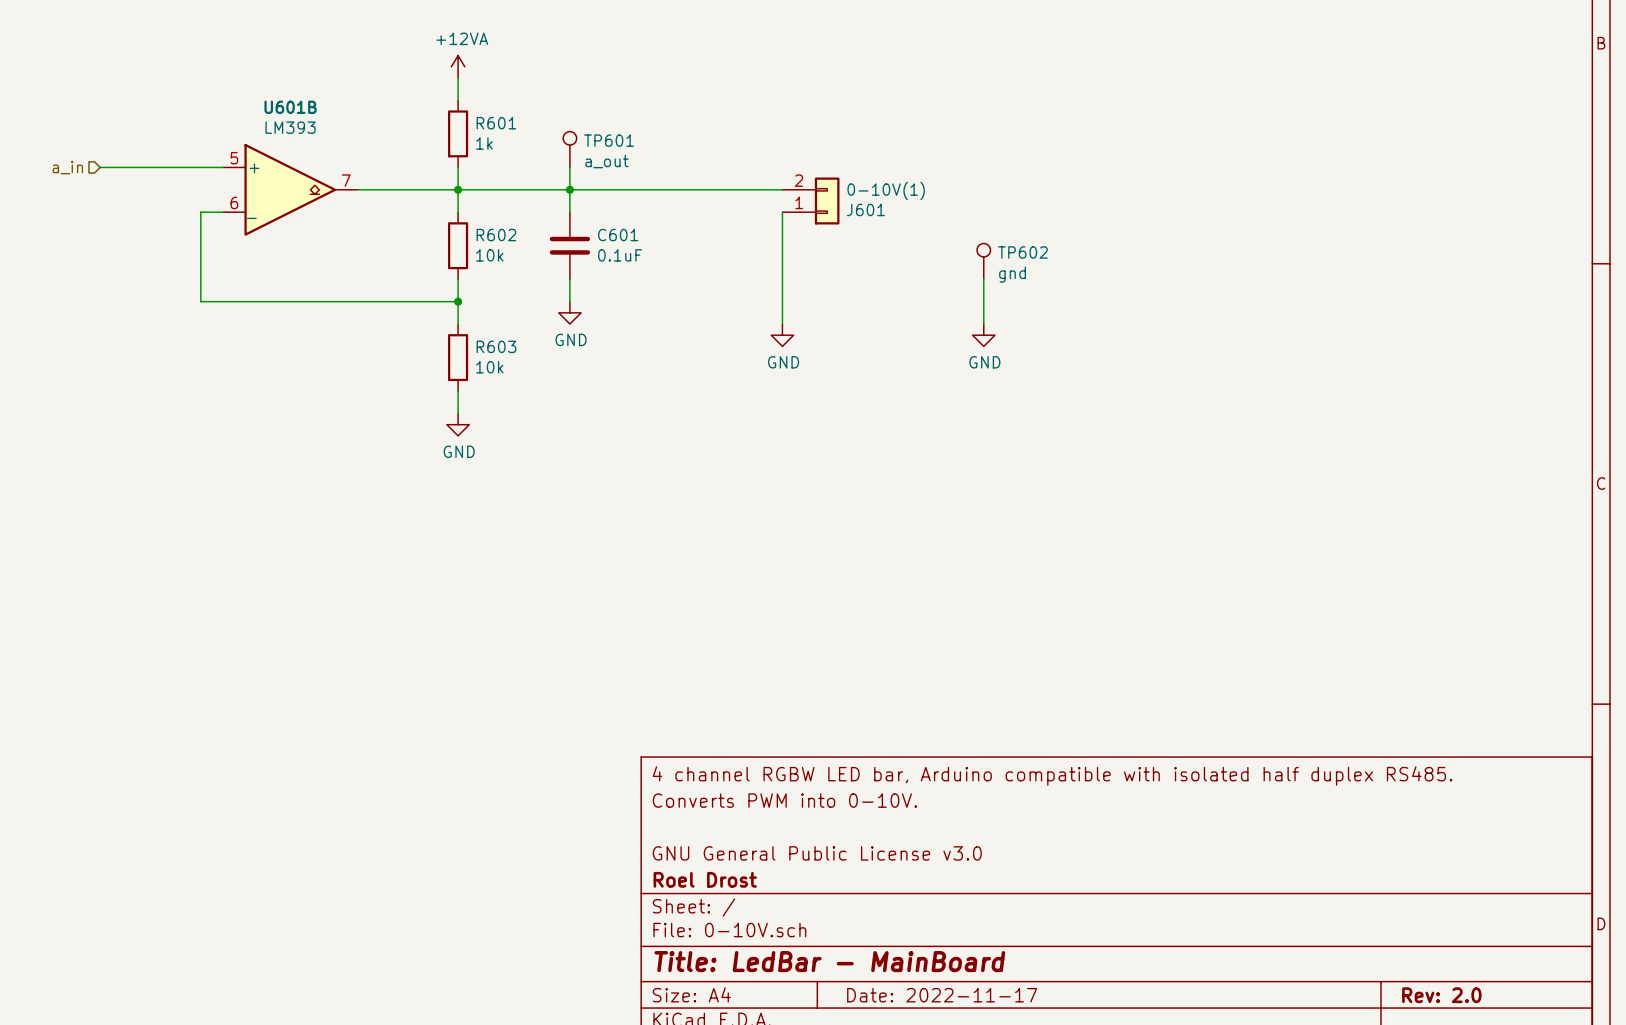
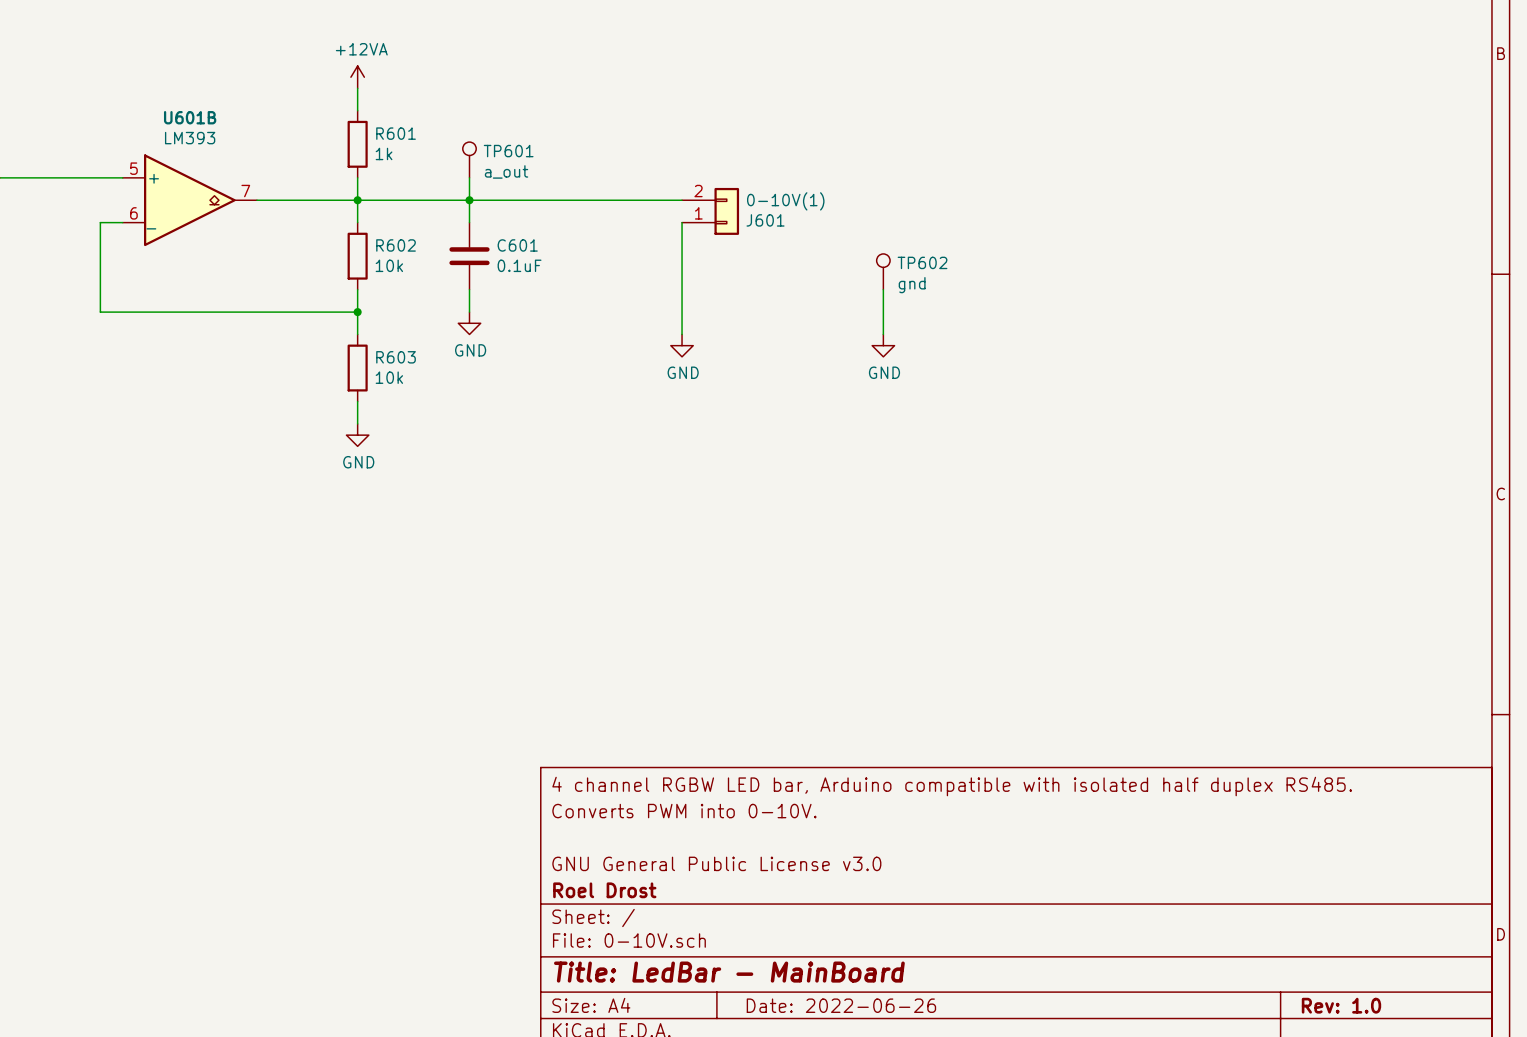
title block: Date: 2022-11-17 (942, 995) -> Date: 2022-06-26 (841, 1005)
title block: Rev: 2.0 (1441, 995) -> Rev: 1.0 (1341, 1005)

